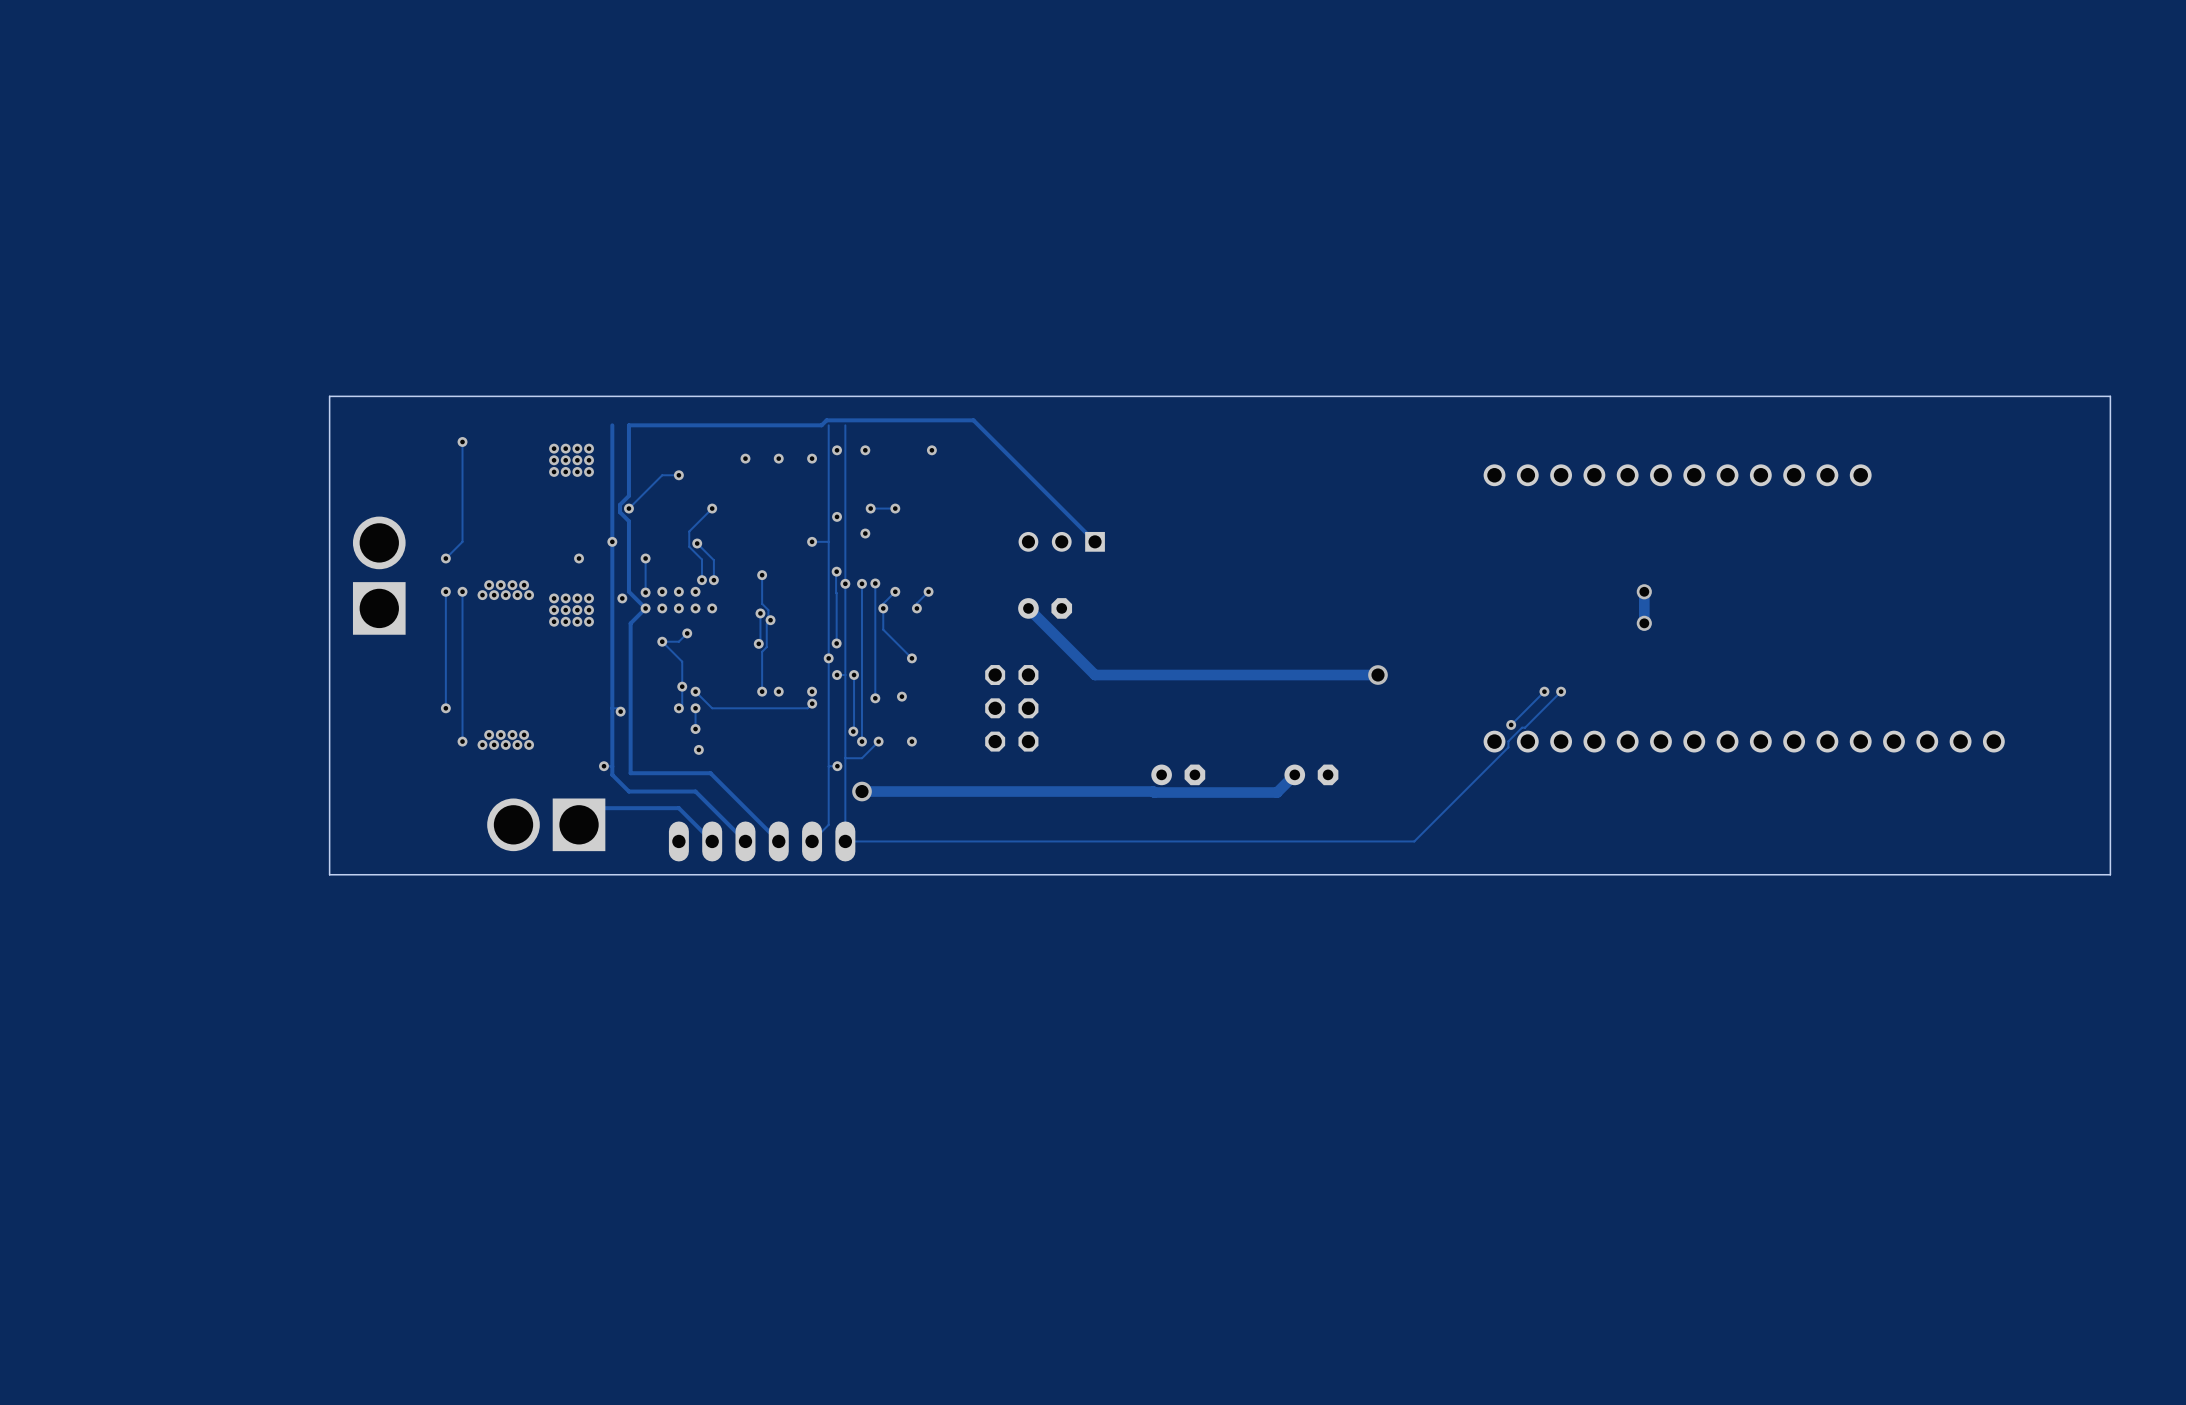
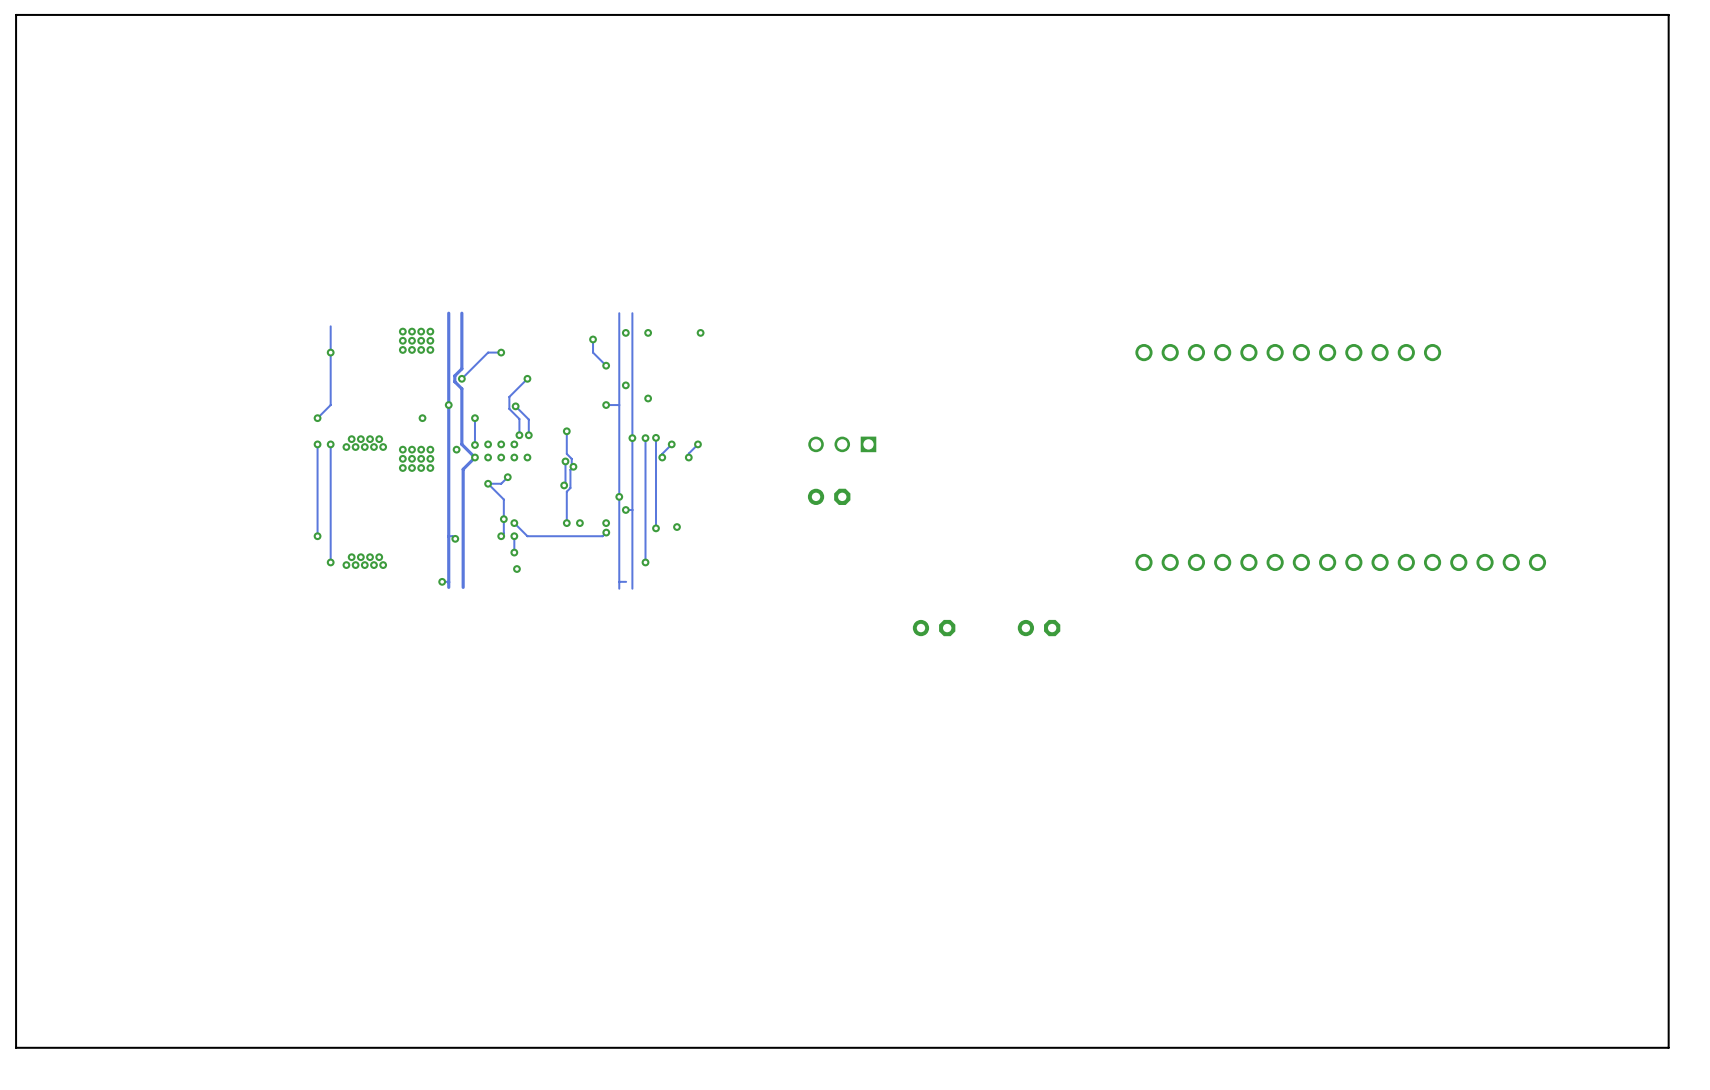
board edge: none -> (1668, 14) (16, 14) (16, 1047) (1668, 1047) (1668, 14)
board edge: (2110, 396) (329, 396) (329, 874) (2110, 874) (2110, 396) -> none
track: (628, 425) (821, 425) (826, 420) (973, 420) (1095, 541) -> none
via position: (462, 441) -> (330, 352)
via: (745, 458) -> none
via: (778, 458) -> none
track: none -> (593, 339) (593, 352) (606, 365)
via: none -> (593, 339)
via: (812, 458) -> none
via: none -> (606, 365)
via: (870, 508) -> none
track: (895, 508) (870, 508) -> none
via: (895, 508) -> none
part position: (1061, 541) -> (842, 444)
track: (836, 571) (836, 643) -> none
via: (836, 571) -> none
part: (379, 575) -> none
track: (1644, 591) (1644, 623) -> none
via: (1644, 591) -> none
track: (883, 608) (883, 629) (911, 658) -> none
track: (1028, 608) (1095, 675) (1378, 675) -> none
part position: (1045, 608) -> (829, 496)
via: (1644, 623) -> none
via: (836, 643) -> none
via: (911, 658) -> none
track: (854, 675) (853, 731) -> none
via: (854, 675) -> none
via: (1378, 675) -> none
track: (1544, 691) (1511, 724) -> none
via: (1544, 691) -> none
track: (1561, 691) (1525, 727) (1522, 727) (1508, 741) (1508, 747) (1414, 841) (845, 841) (845, 774) -> none
via: (1561, 691) -> none
part: (1011, 708) -> none
via: (1511, 724) -> none
via: (853, 731) -> none
track: (878, 741) (862, 758) (845, 758) -> none
via: (878, 741) -> none
via: (911, 741) -> none
via: (837, 766) -> none
track: (612, 773) (628, 791) (695, 791) (745, 841) -> none
track: (630, 773) (710, 773) (778, 841) -> none
track: (828, 774) (828, 824) (812, 841) -> none
part: (1178, 774) -> none
track: (1294, 774) (1277, 792) (862, 791) -> none
part: (1311, 774) -> none
via: (862, 791) -> none
part: (546, 824) -> none
track: (579, 824) (595, 808) (678, 808) (712, 841) -> none
part: none -> (934, 628)
part: none -> (1039, 628)
part: (762, 841) -> none

